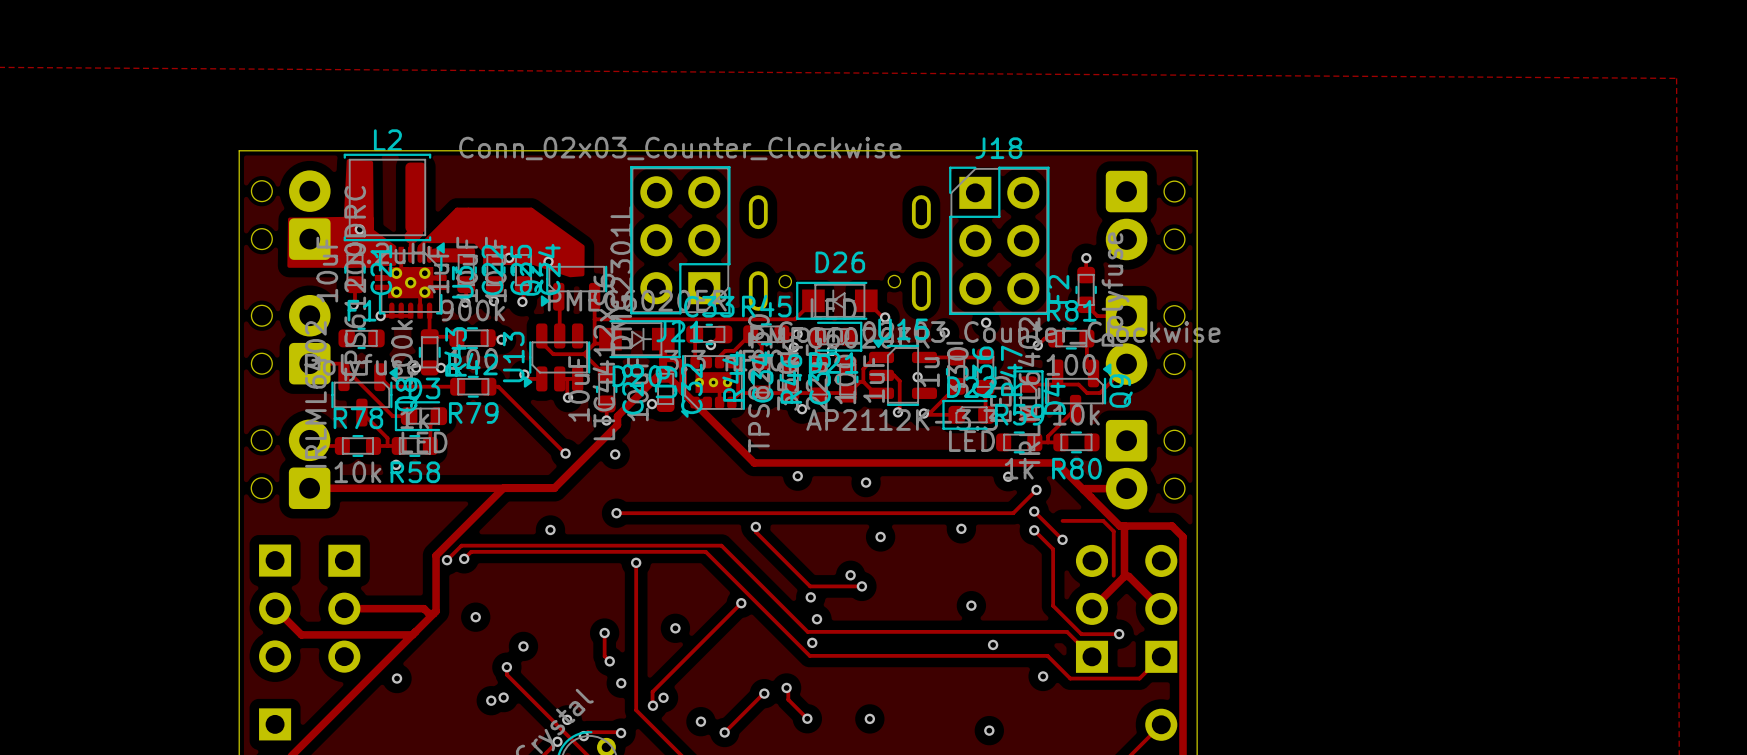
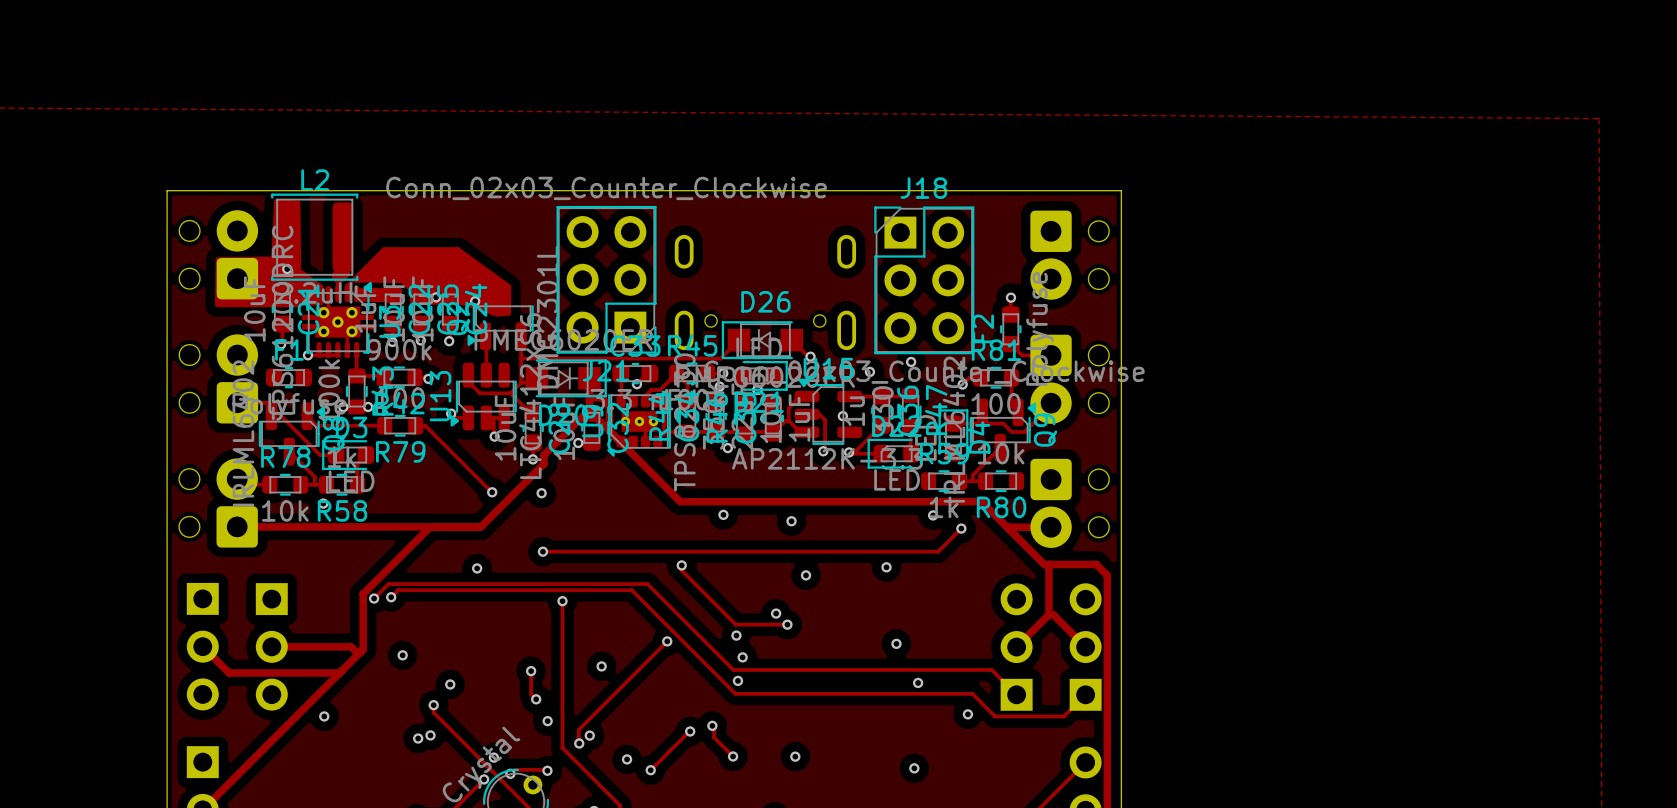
track: (1034, 511) (1062, 539) -> none
via: (1034, 511) -> none
track: (1062, 520) (1103, 520) (1113, 531) (1113, 575) -> none
track: (1034, 530) (1053, 549) (1053, 605) (1081, 634) (1119, 634) -> none
via: (1034, 530) -> none
via: (1062, 539) -> none
via: (1119, 634) -> none

